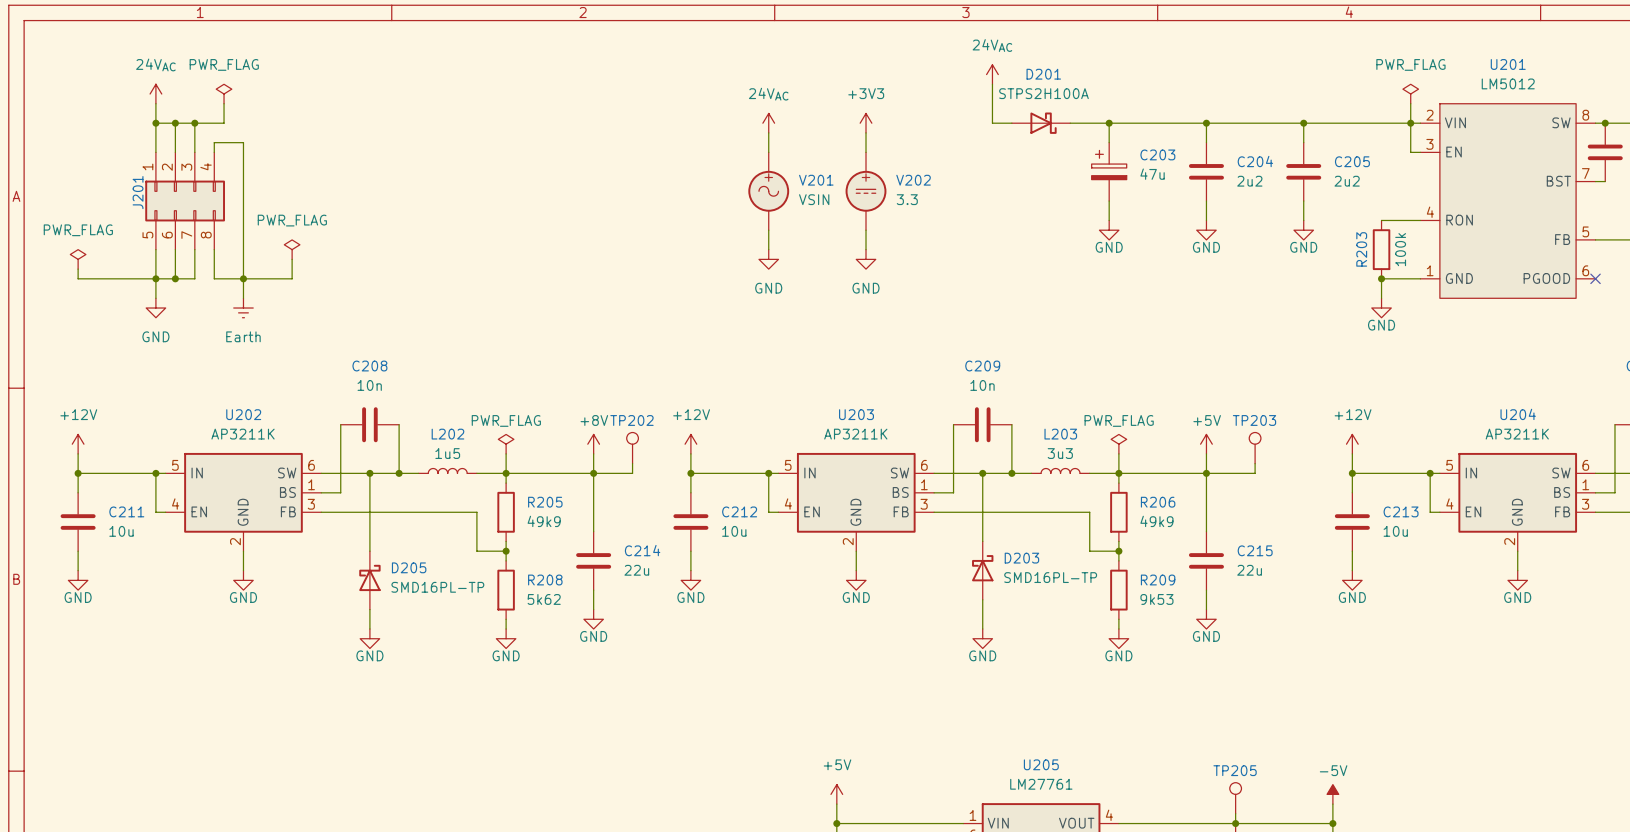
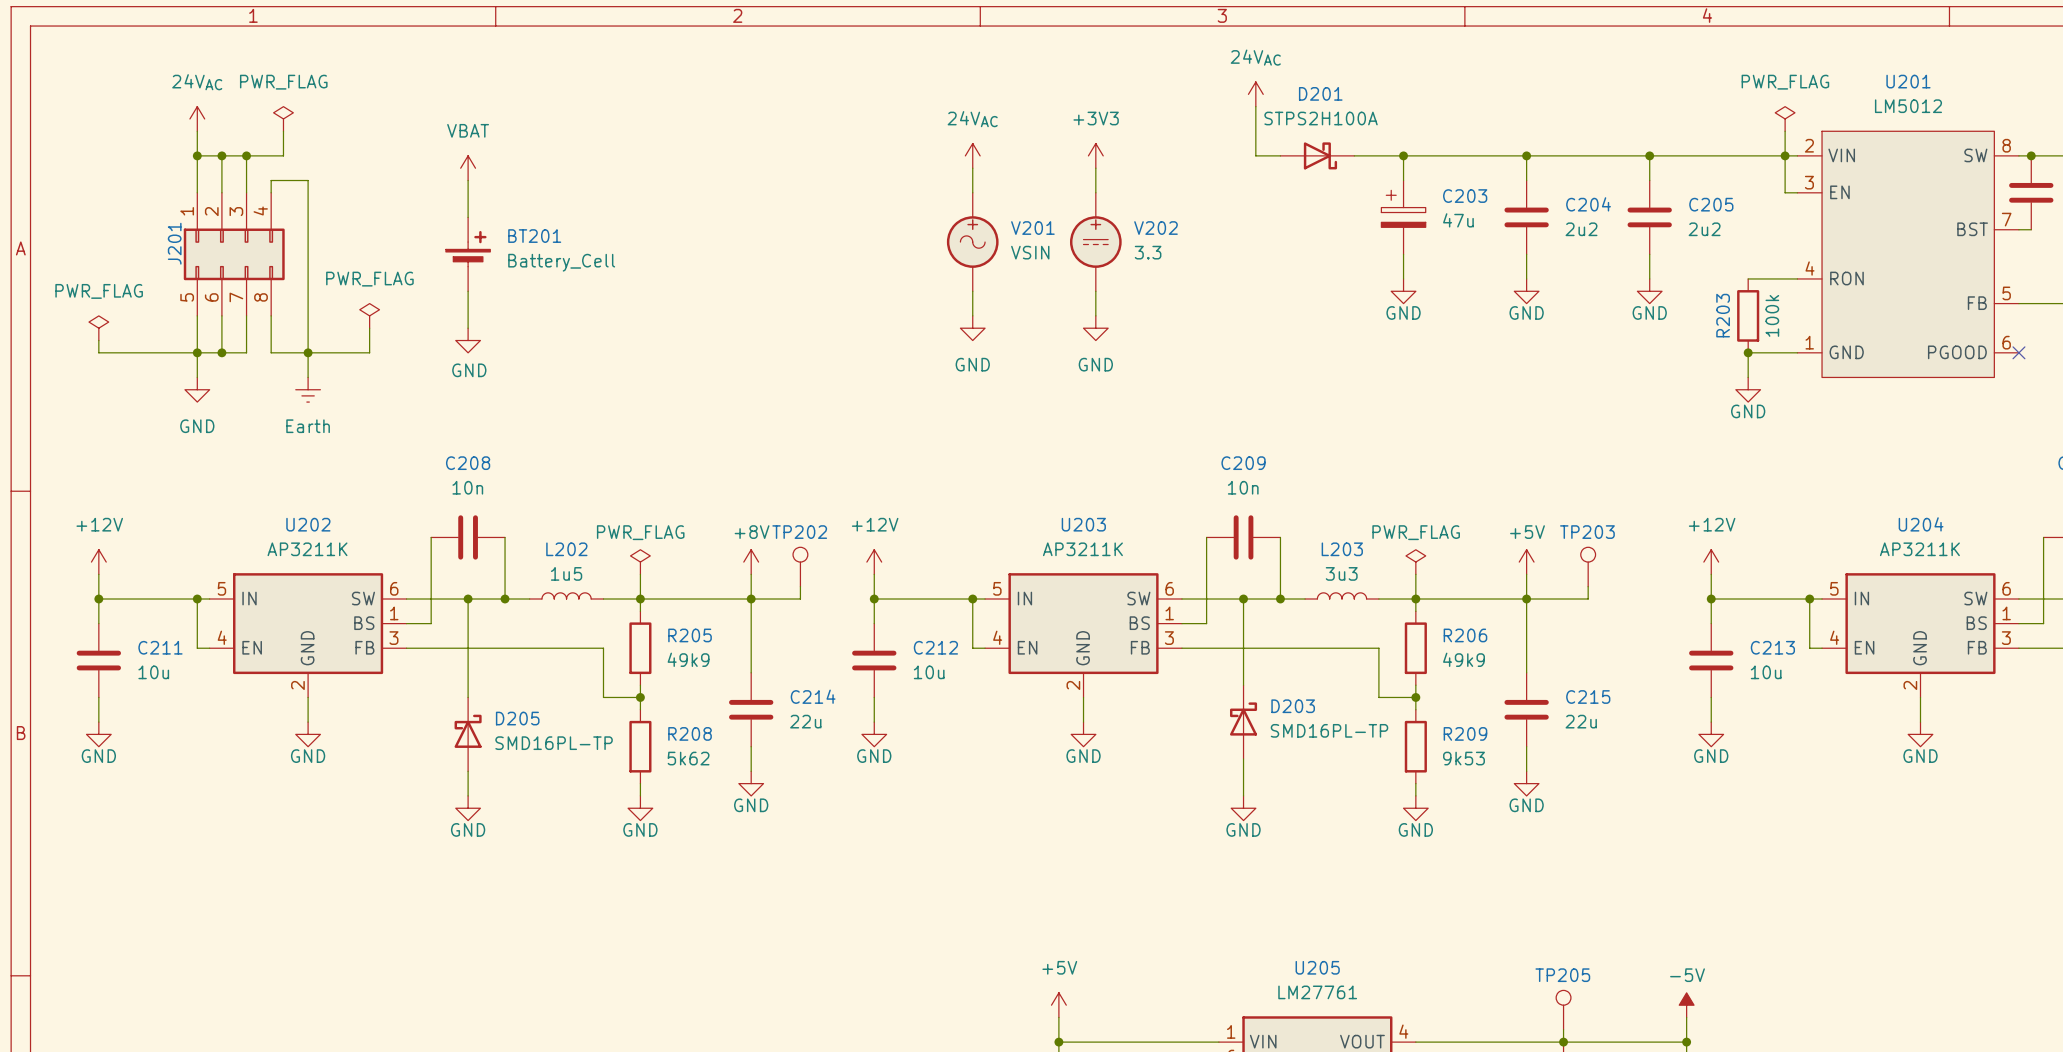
power symbol: none -> VBAT (468, 168)
wire: none -> (468, 180) (468, 217)
BT201: none -> Battery_Cell (468, 254)
wire: none -> (468, 291) (468, 328)
power symbol: none -> GND (468, 340)

